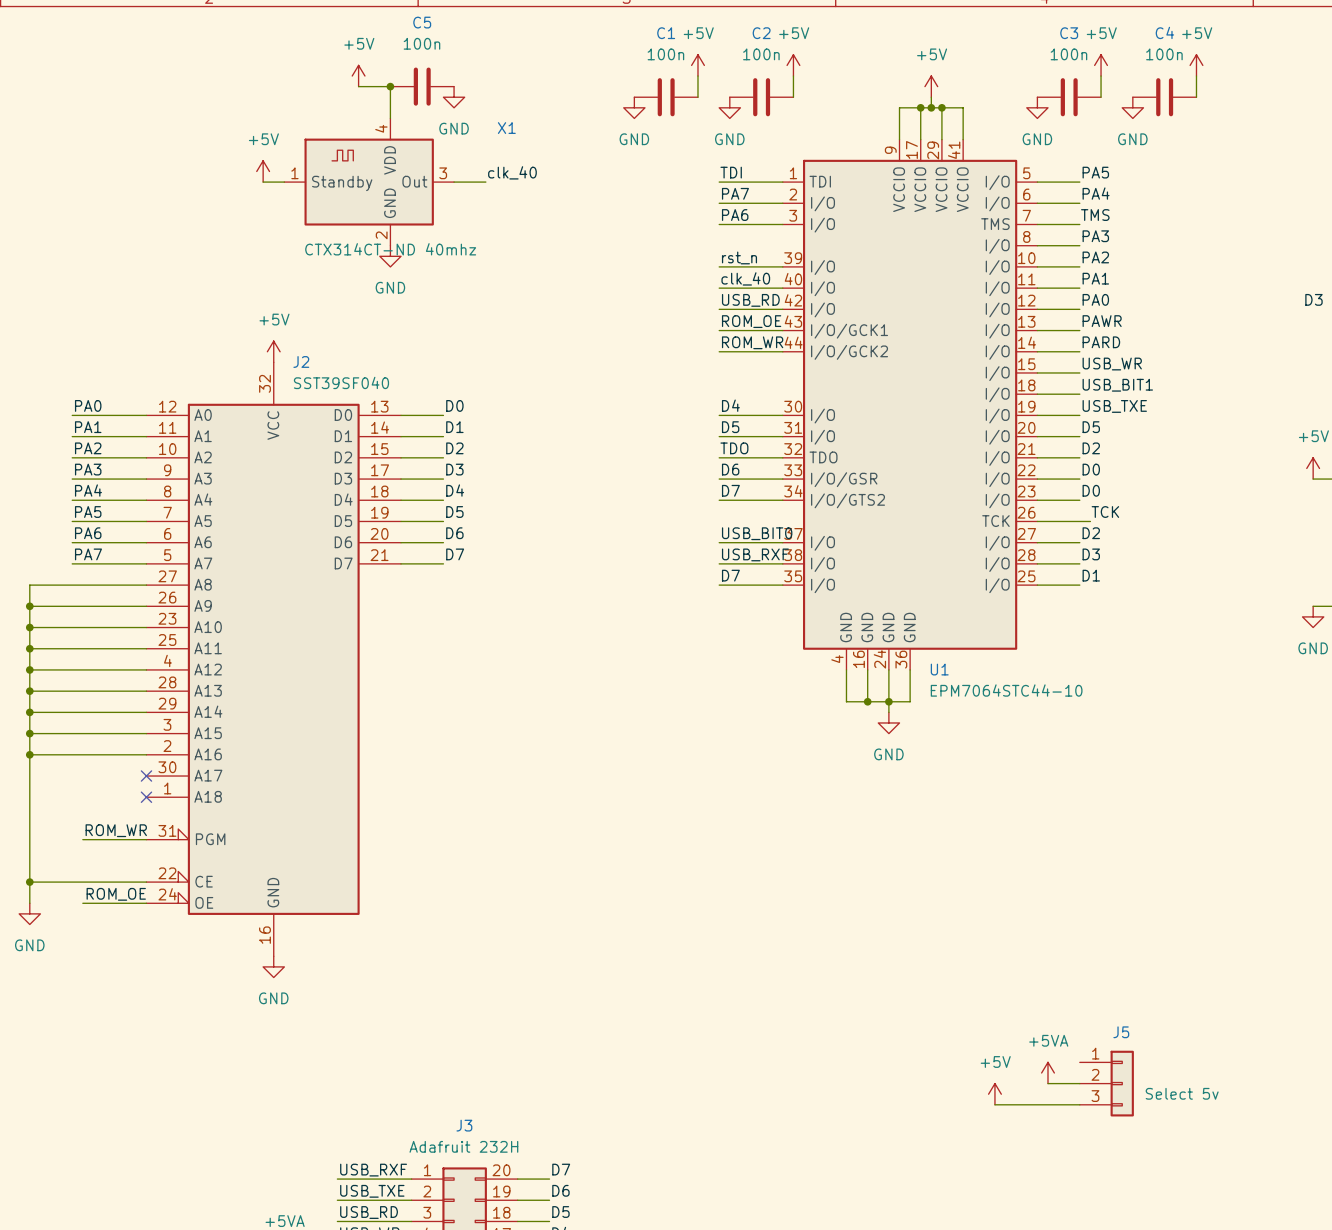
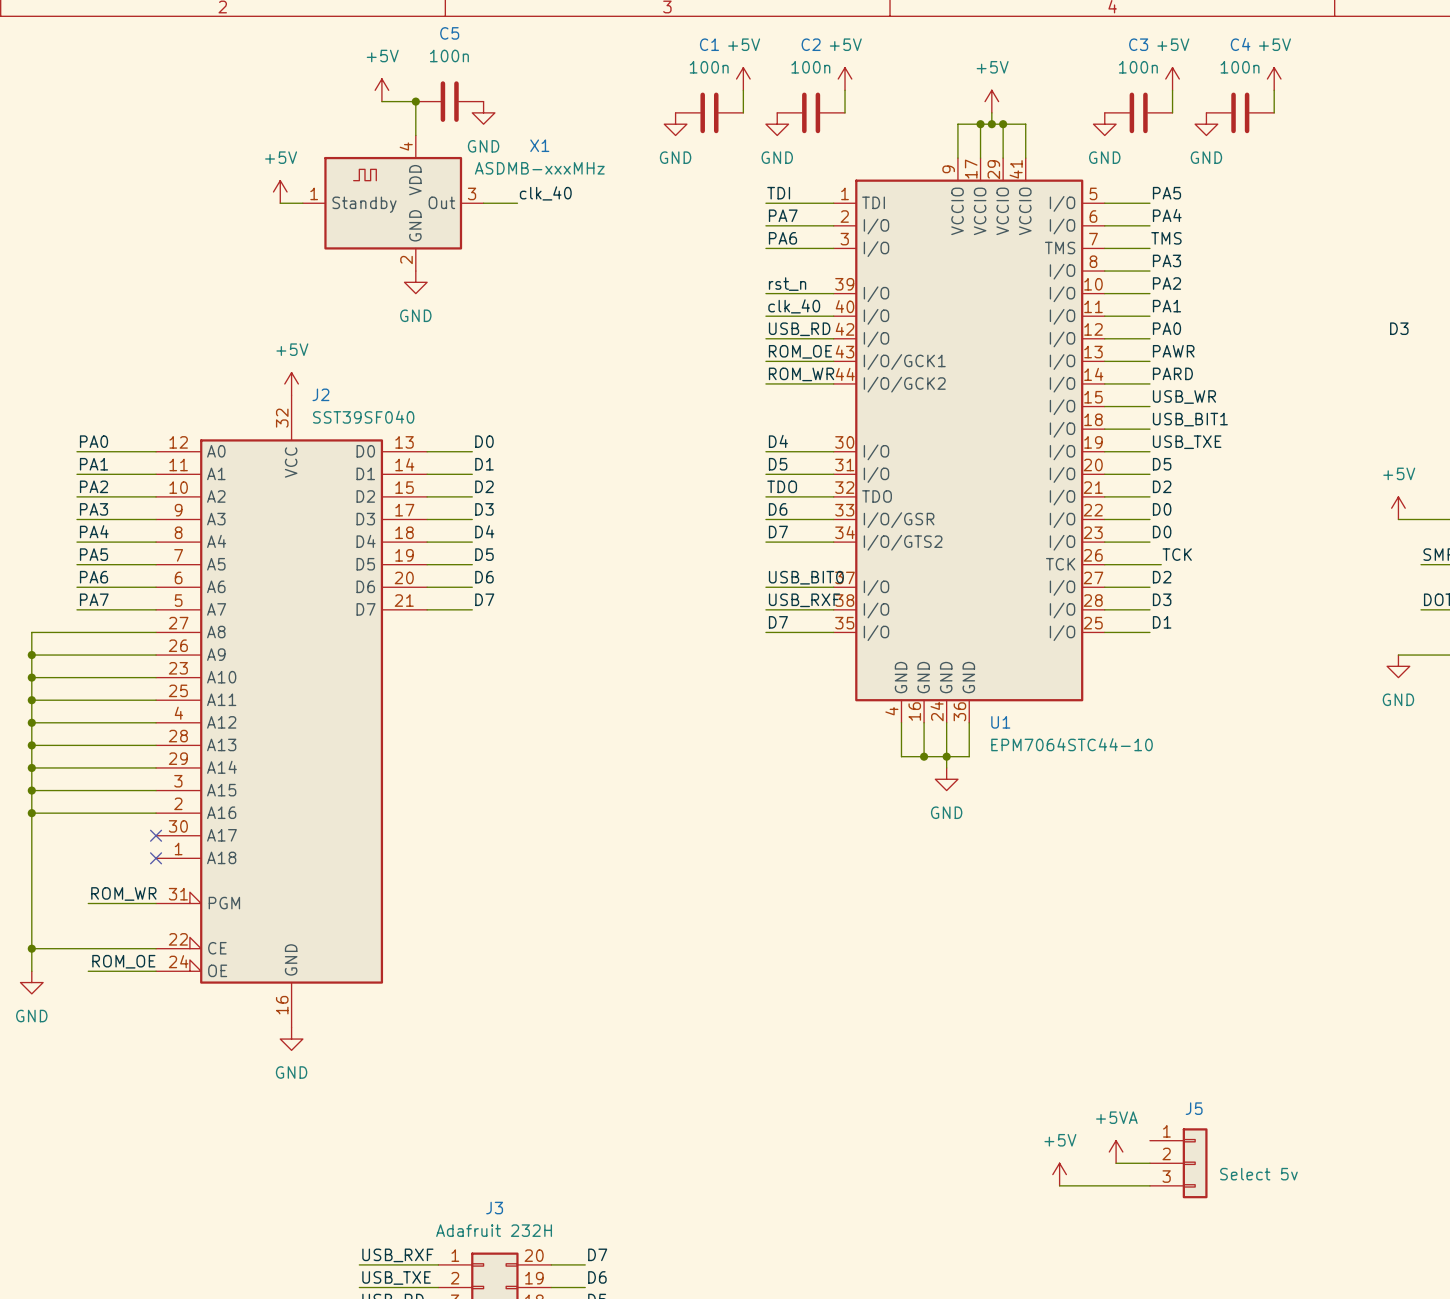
X1 value: CTX314CT-ND 40mhz (390, 249) -> ASDMB-xxxMHz (539, 168)

